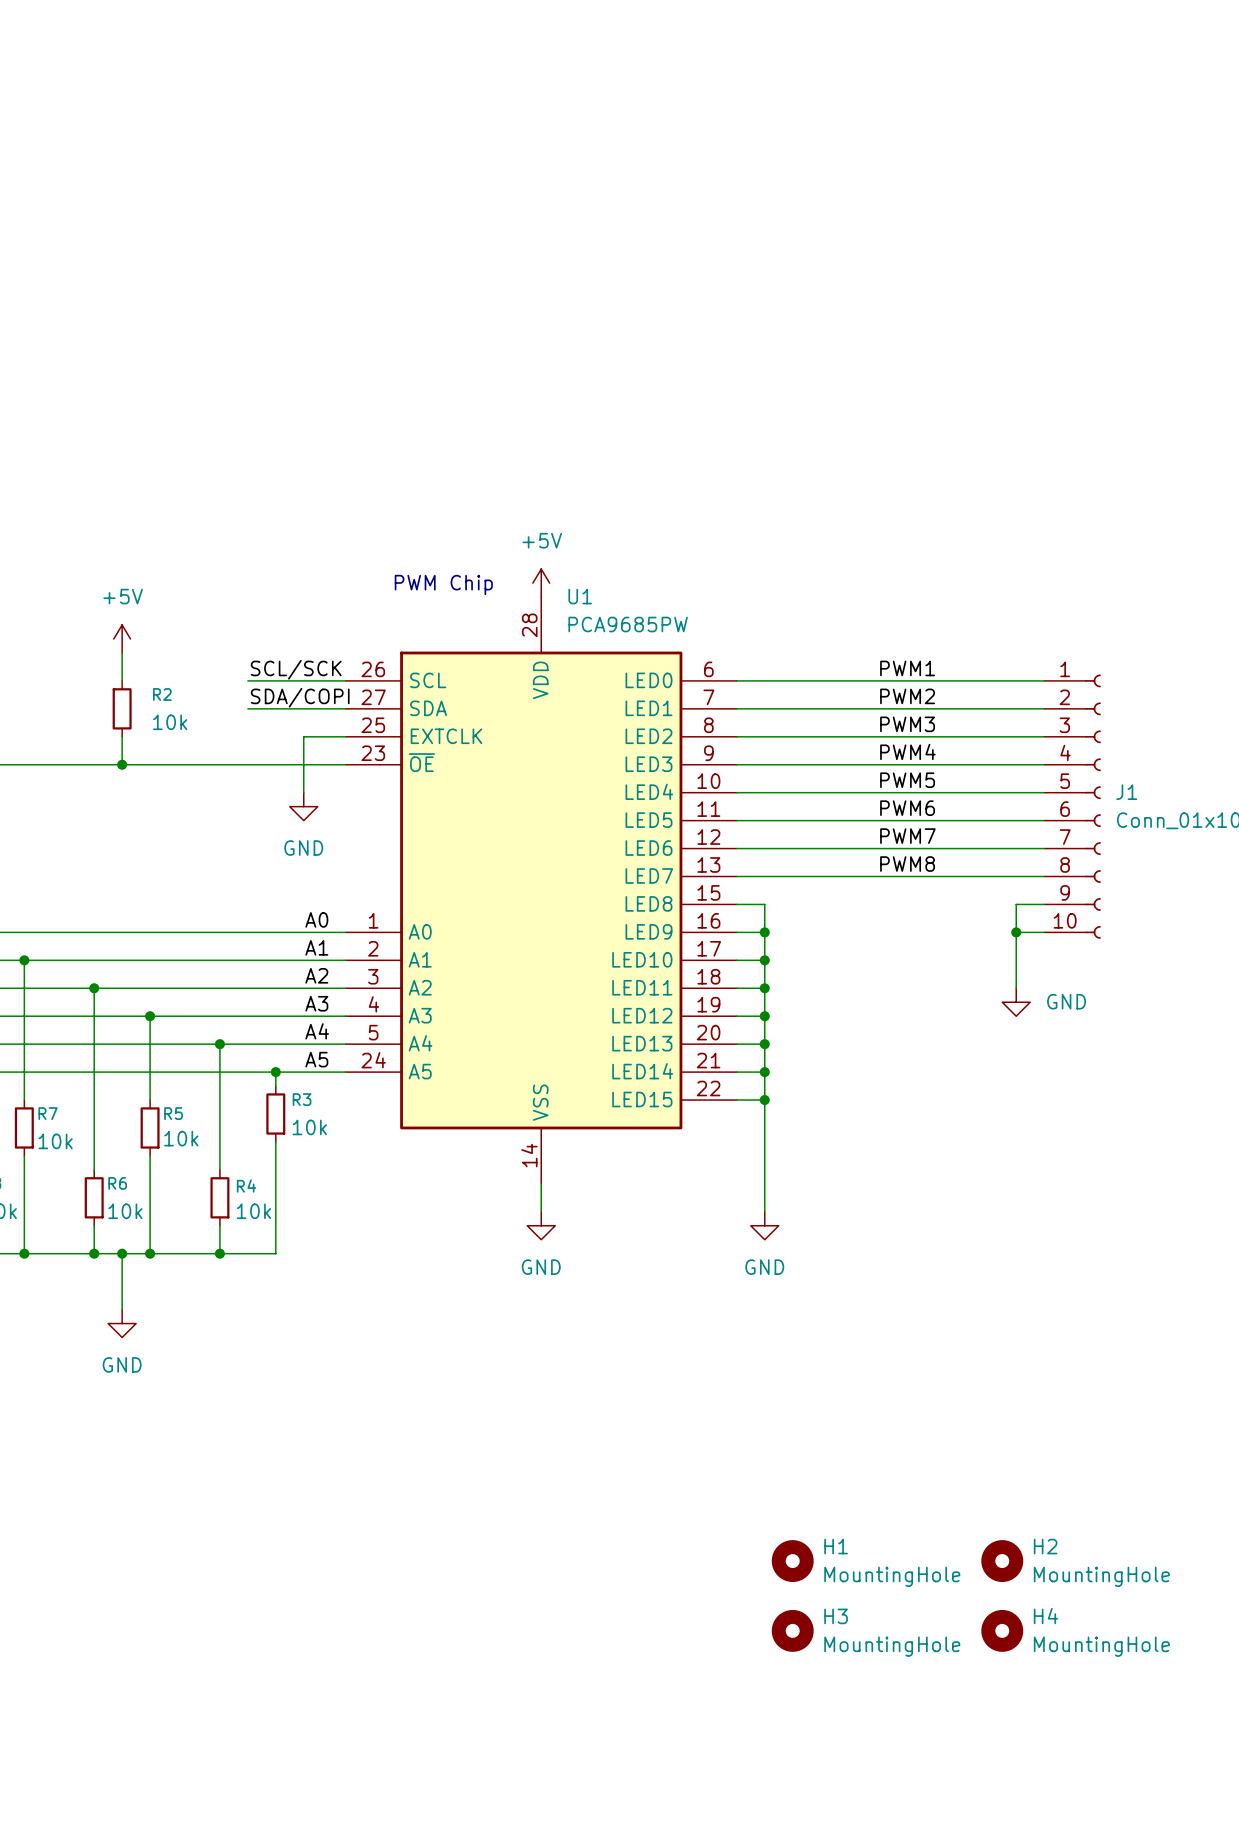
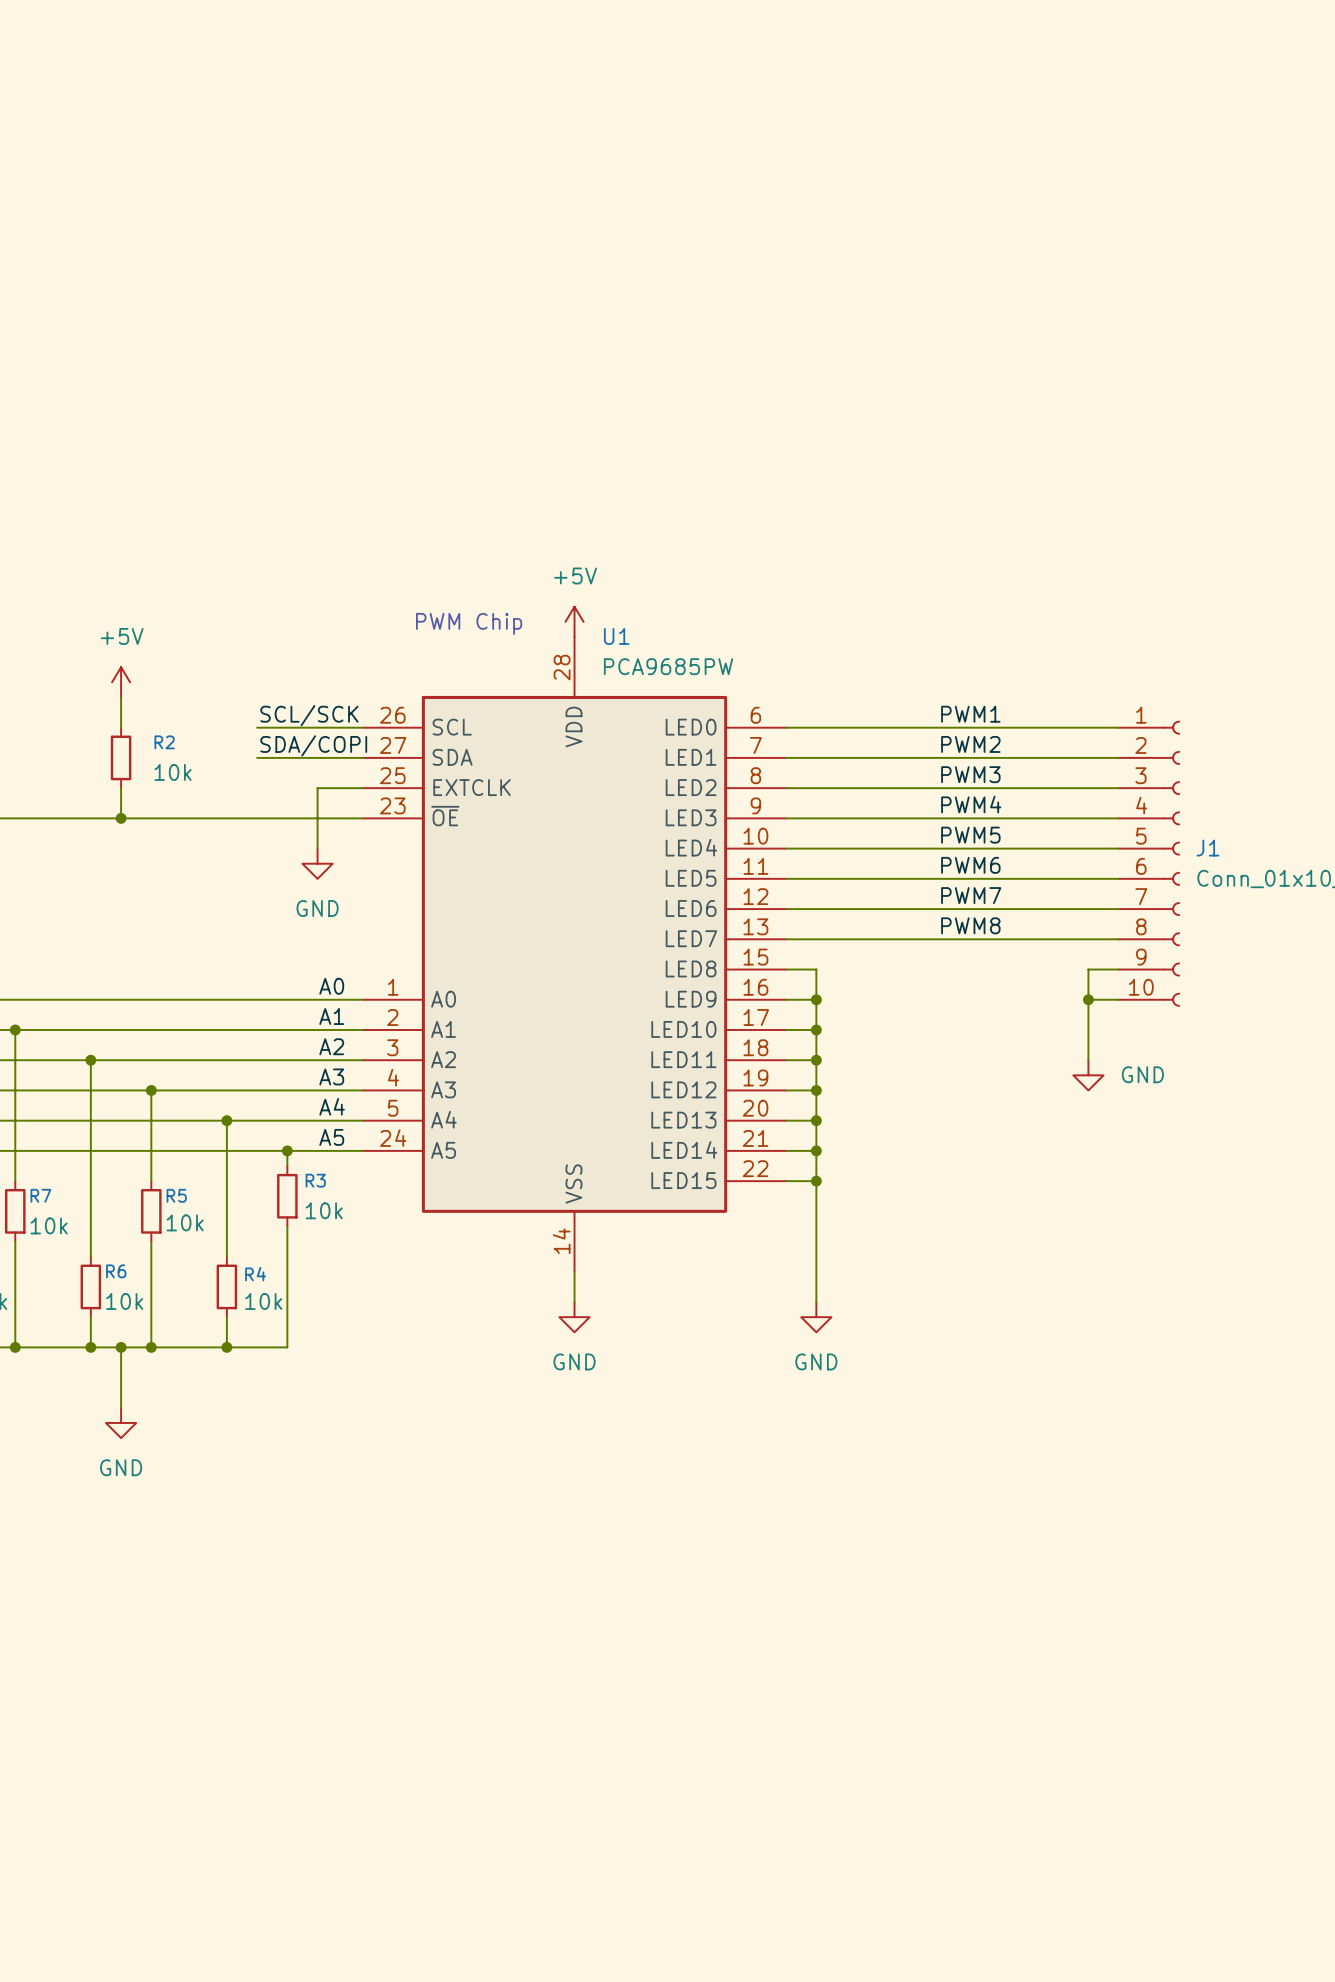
H1: MountingHole (792, 1561) -> none
H2: MountingHole (1002, 1561) -> none
H3: MountingHole (792, 1630) -> none
H4: MountingHole (1002, 1630) -> none

